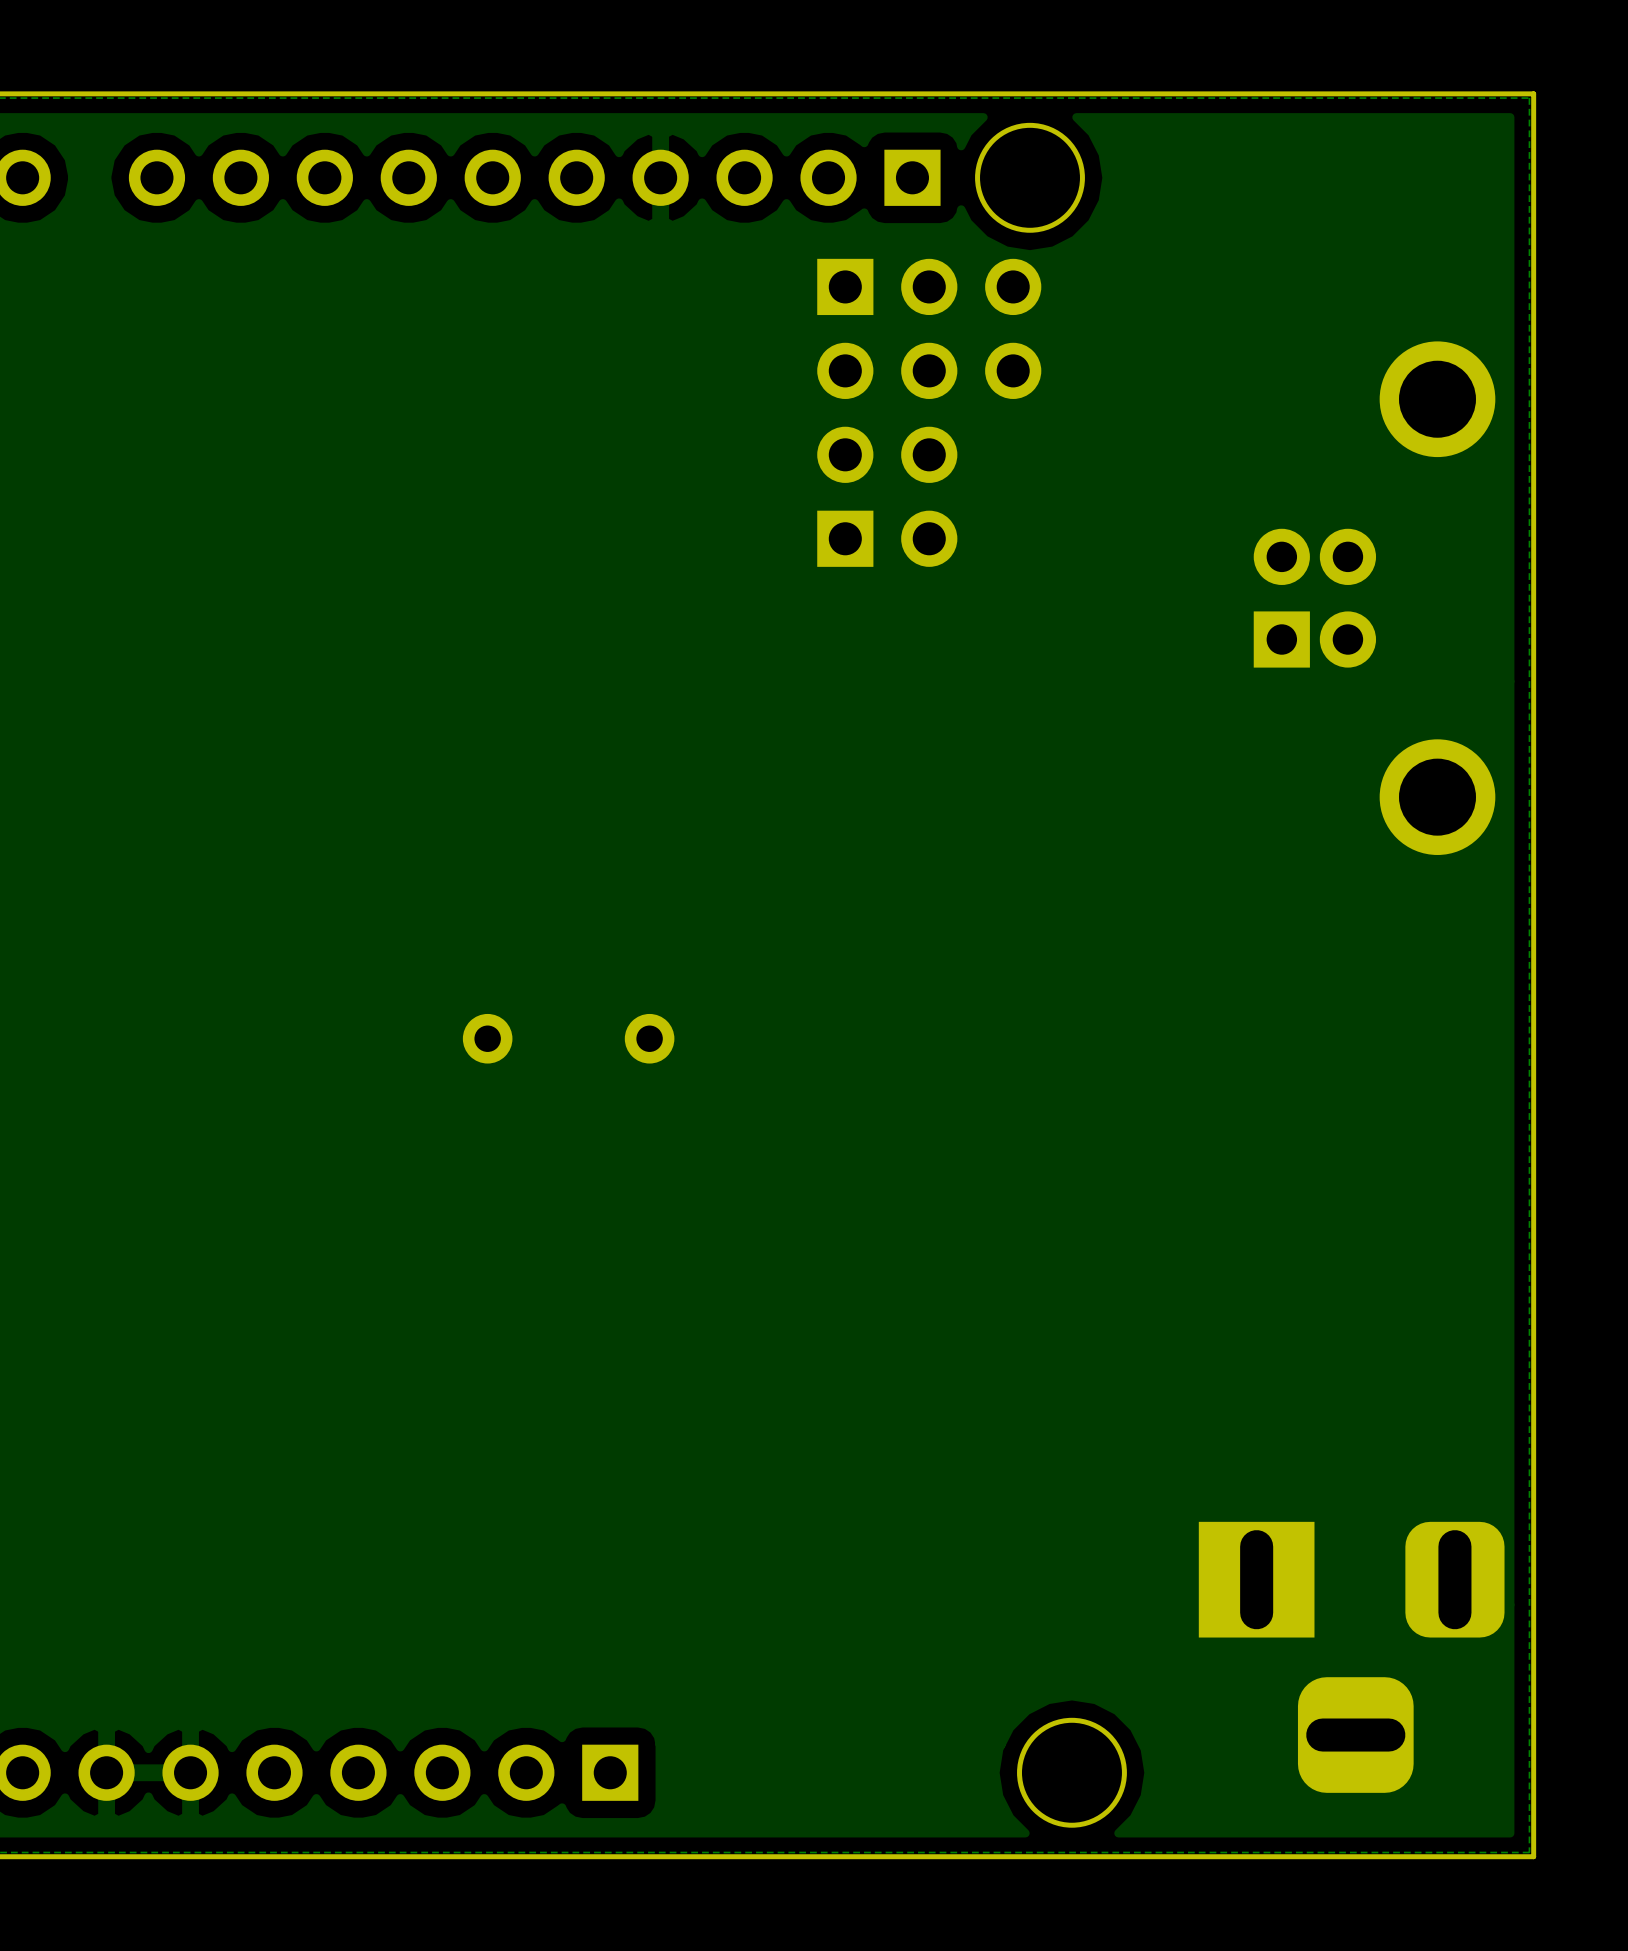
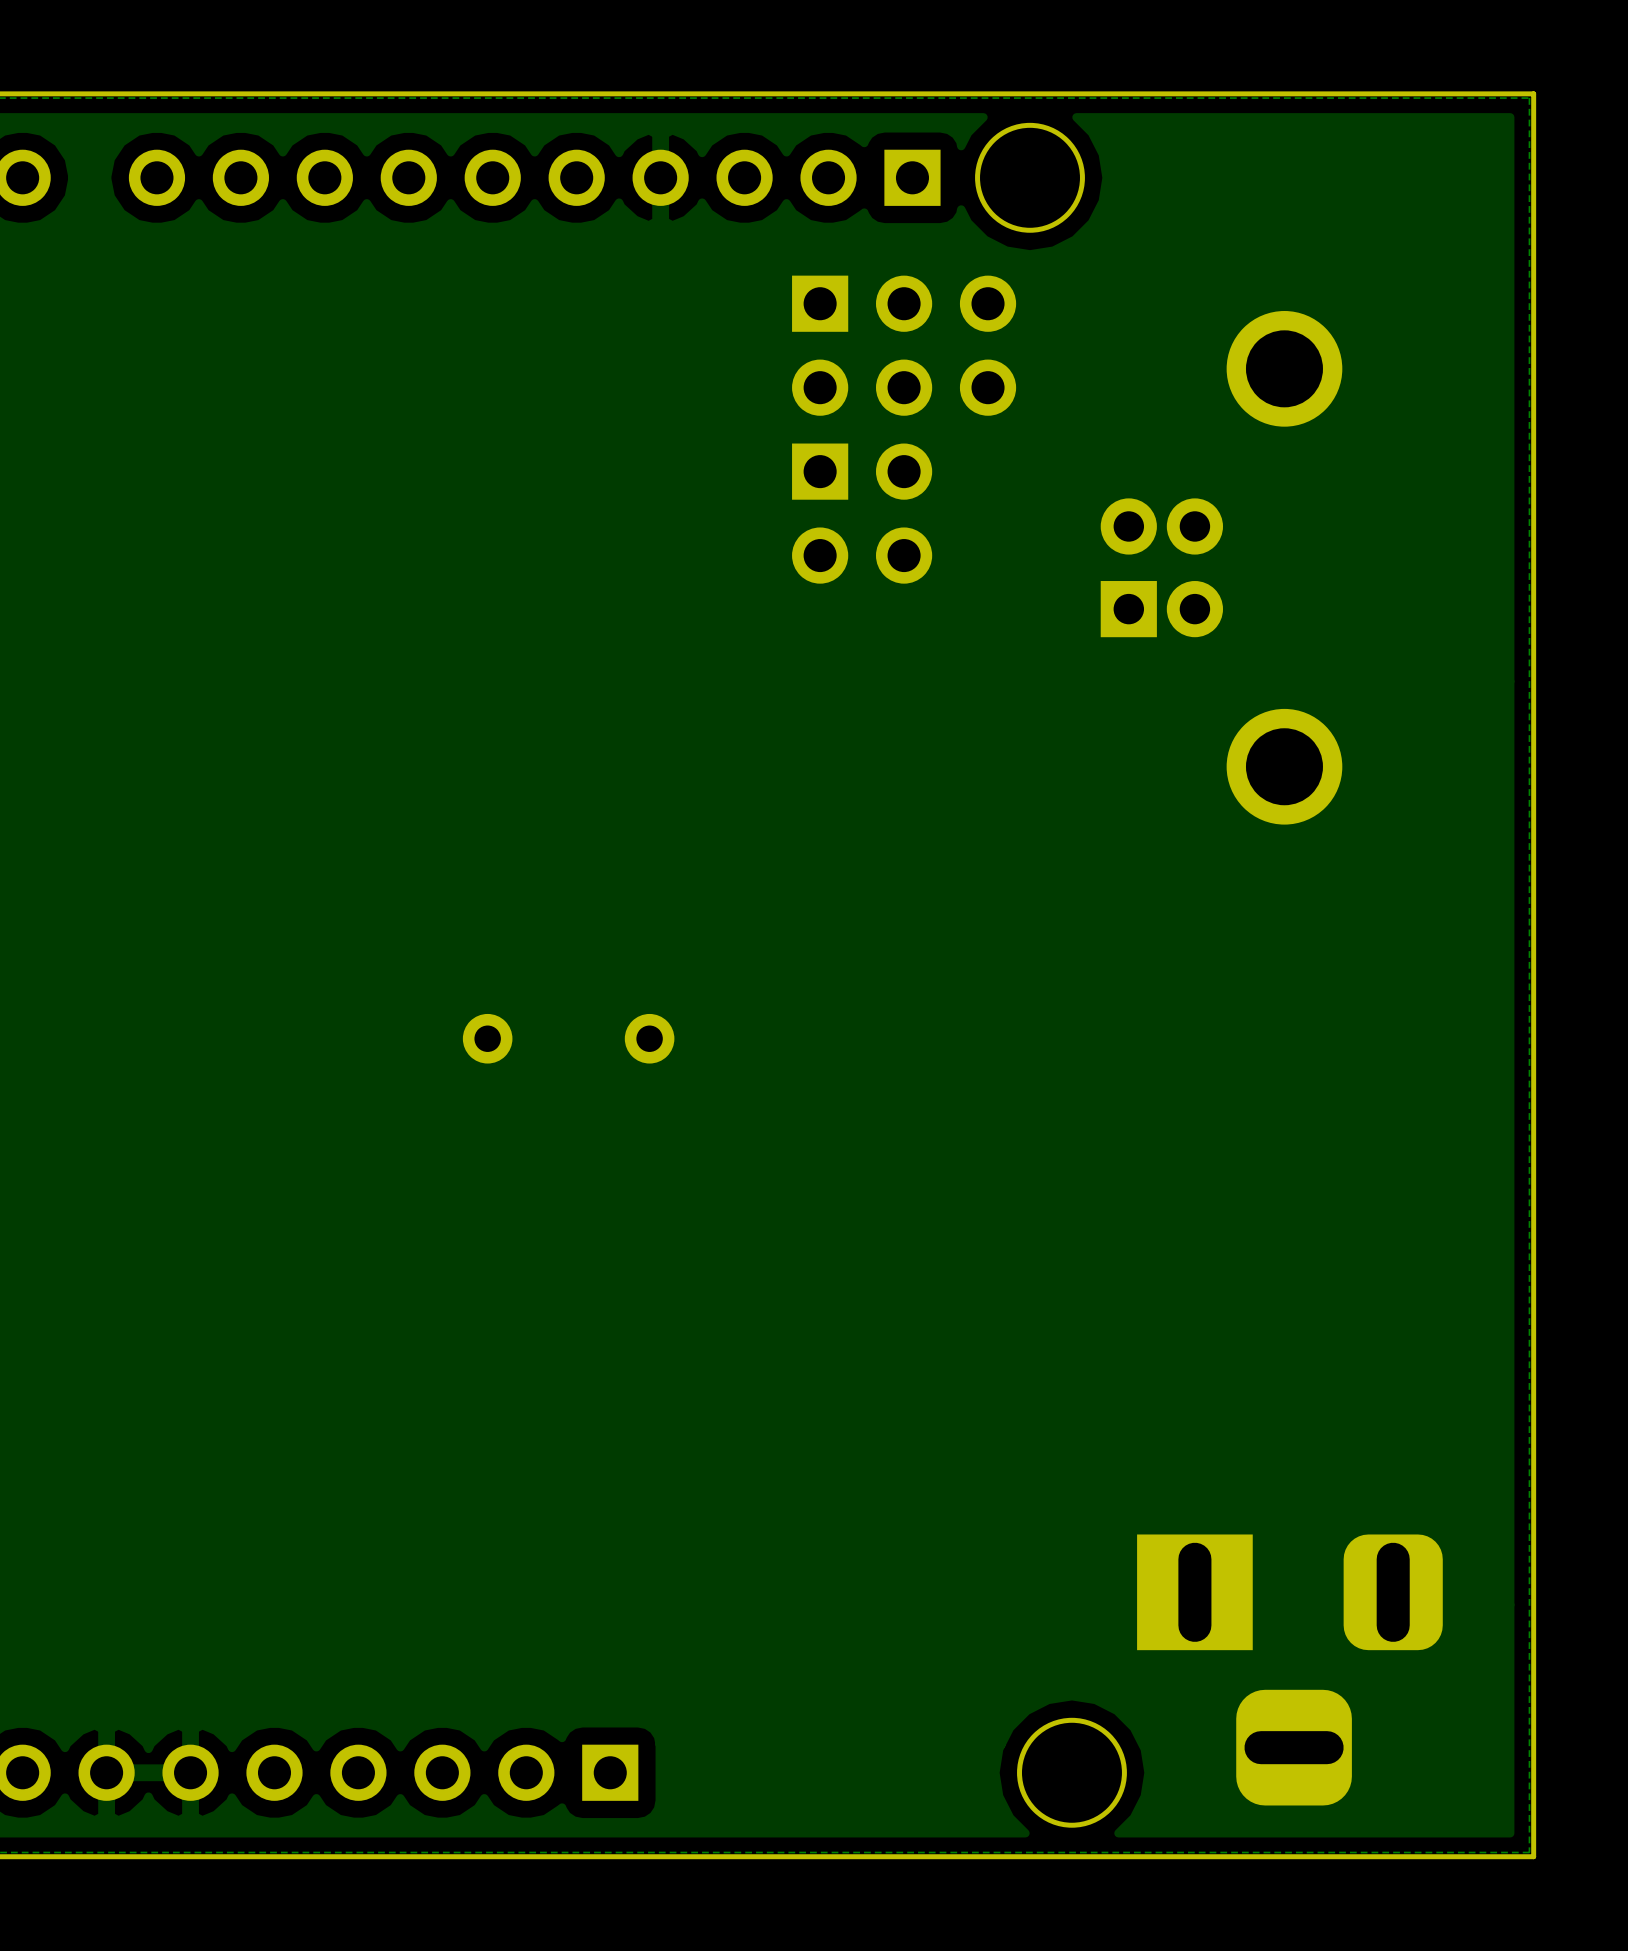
part position: (929, 328) -> (904, 345)
part rotation: 0° (887, 496) -> 90° clockwise (862, 513)
part position: (1374, 598) -> (1221, 567)
part position: (1351, 1657) -> (1289, 1669)

